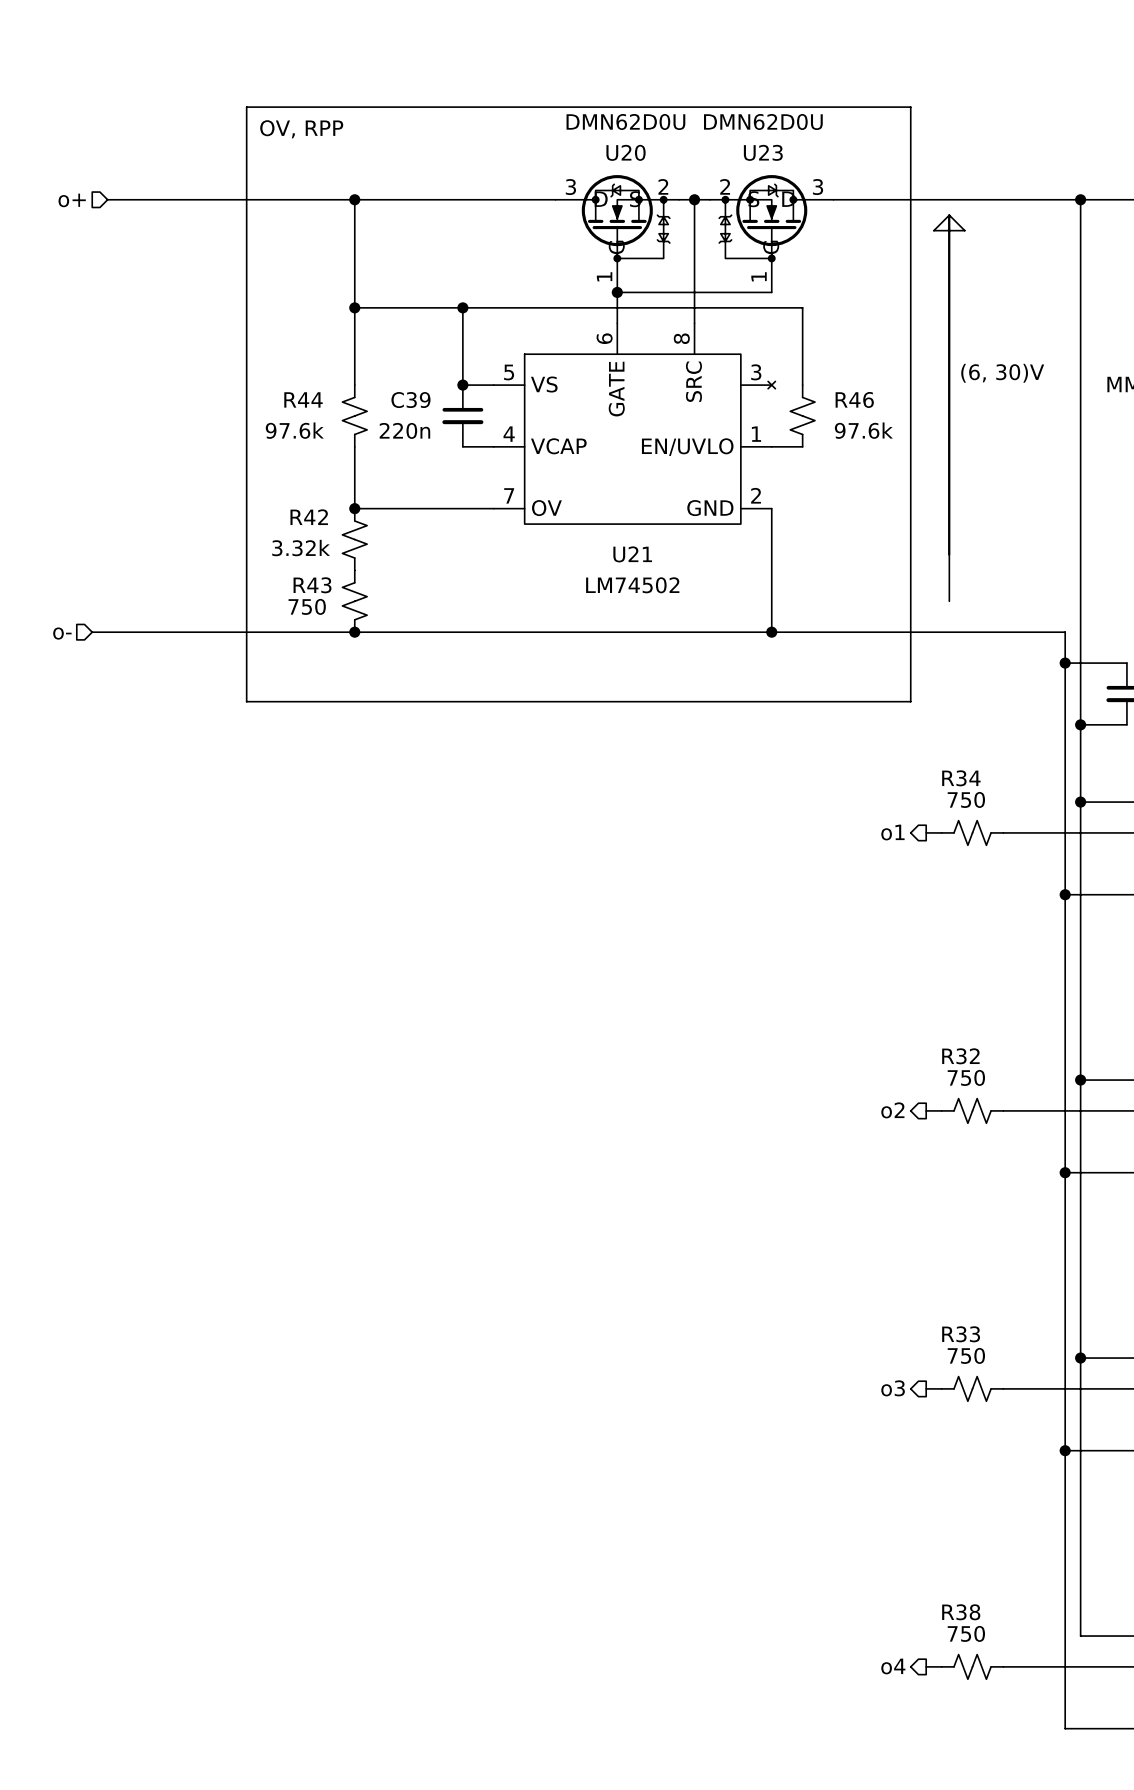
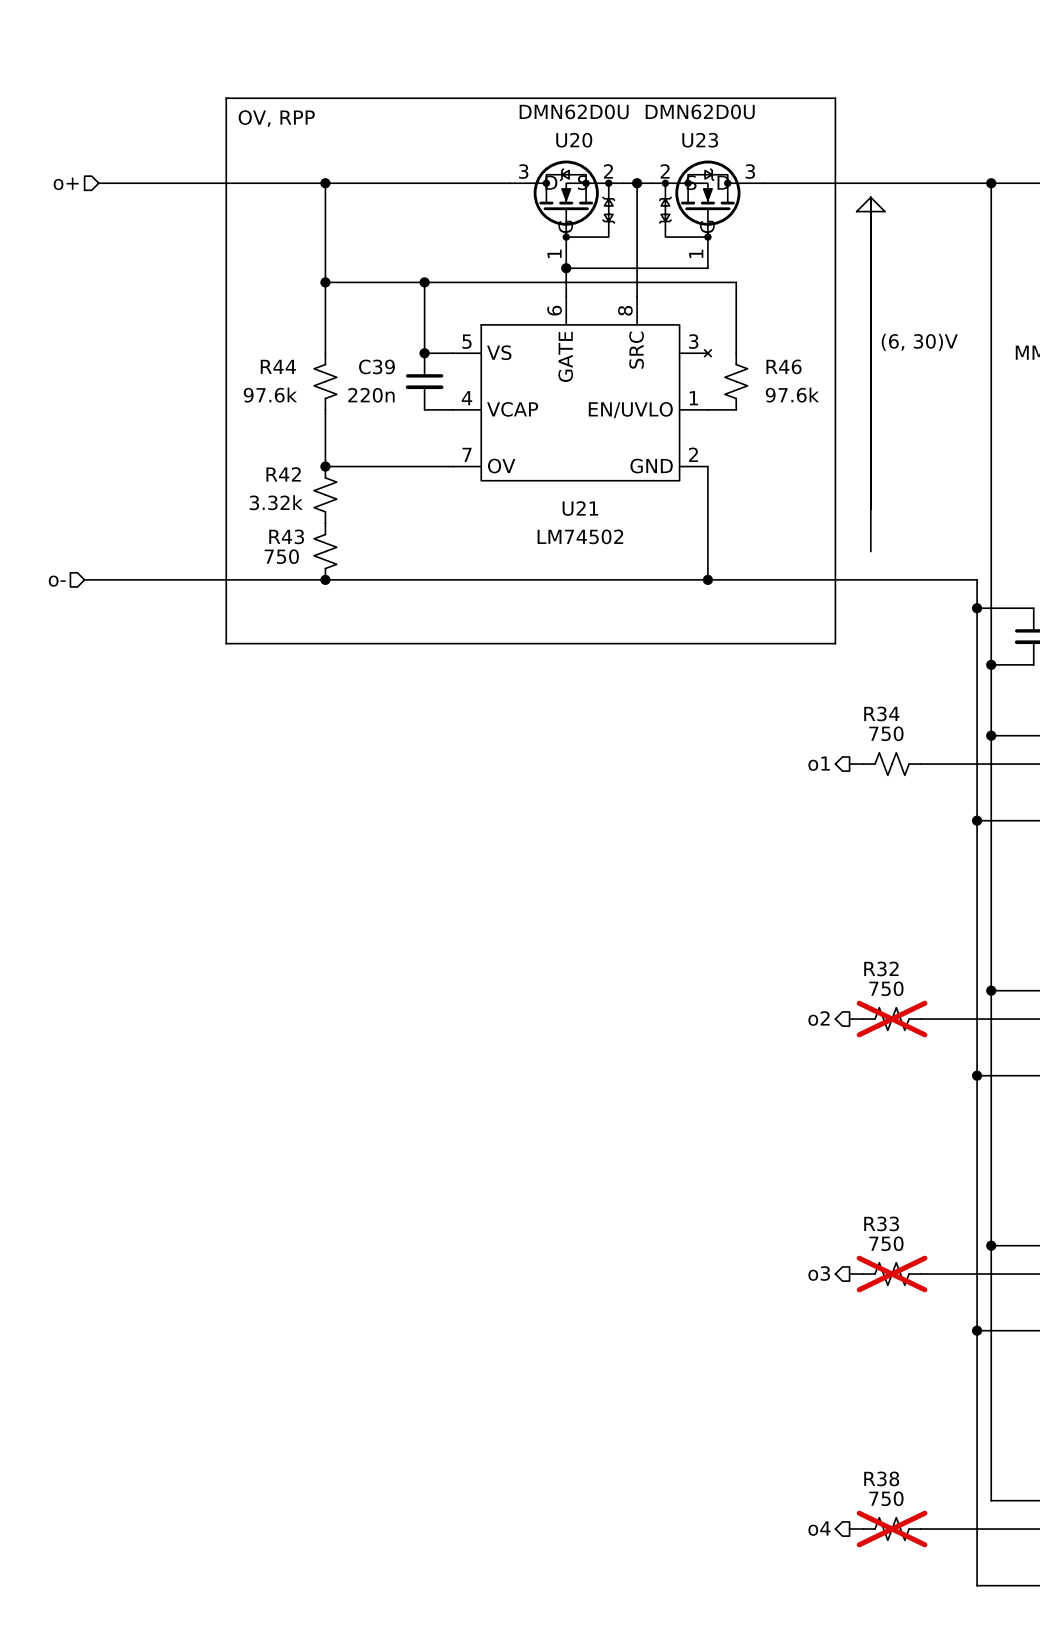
R32 do-not-place cross: none -> (892, 1019)
R33 do-not-place cross: none -> (892, 1274)
R38 do-not-place cross: none -> (892, 1529)

